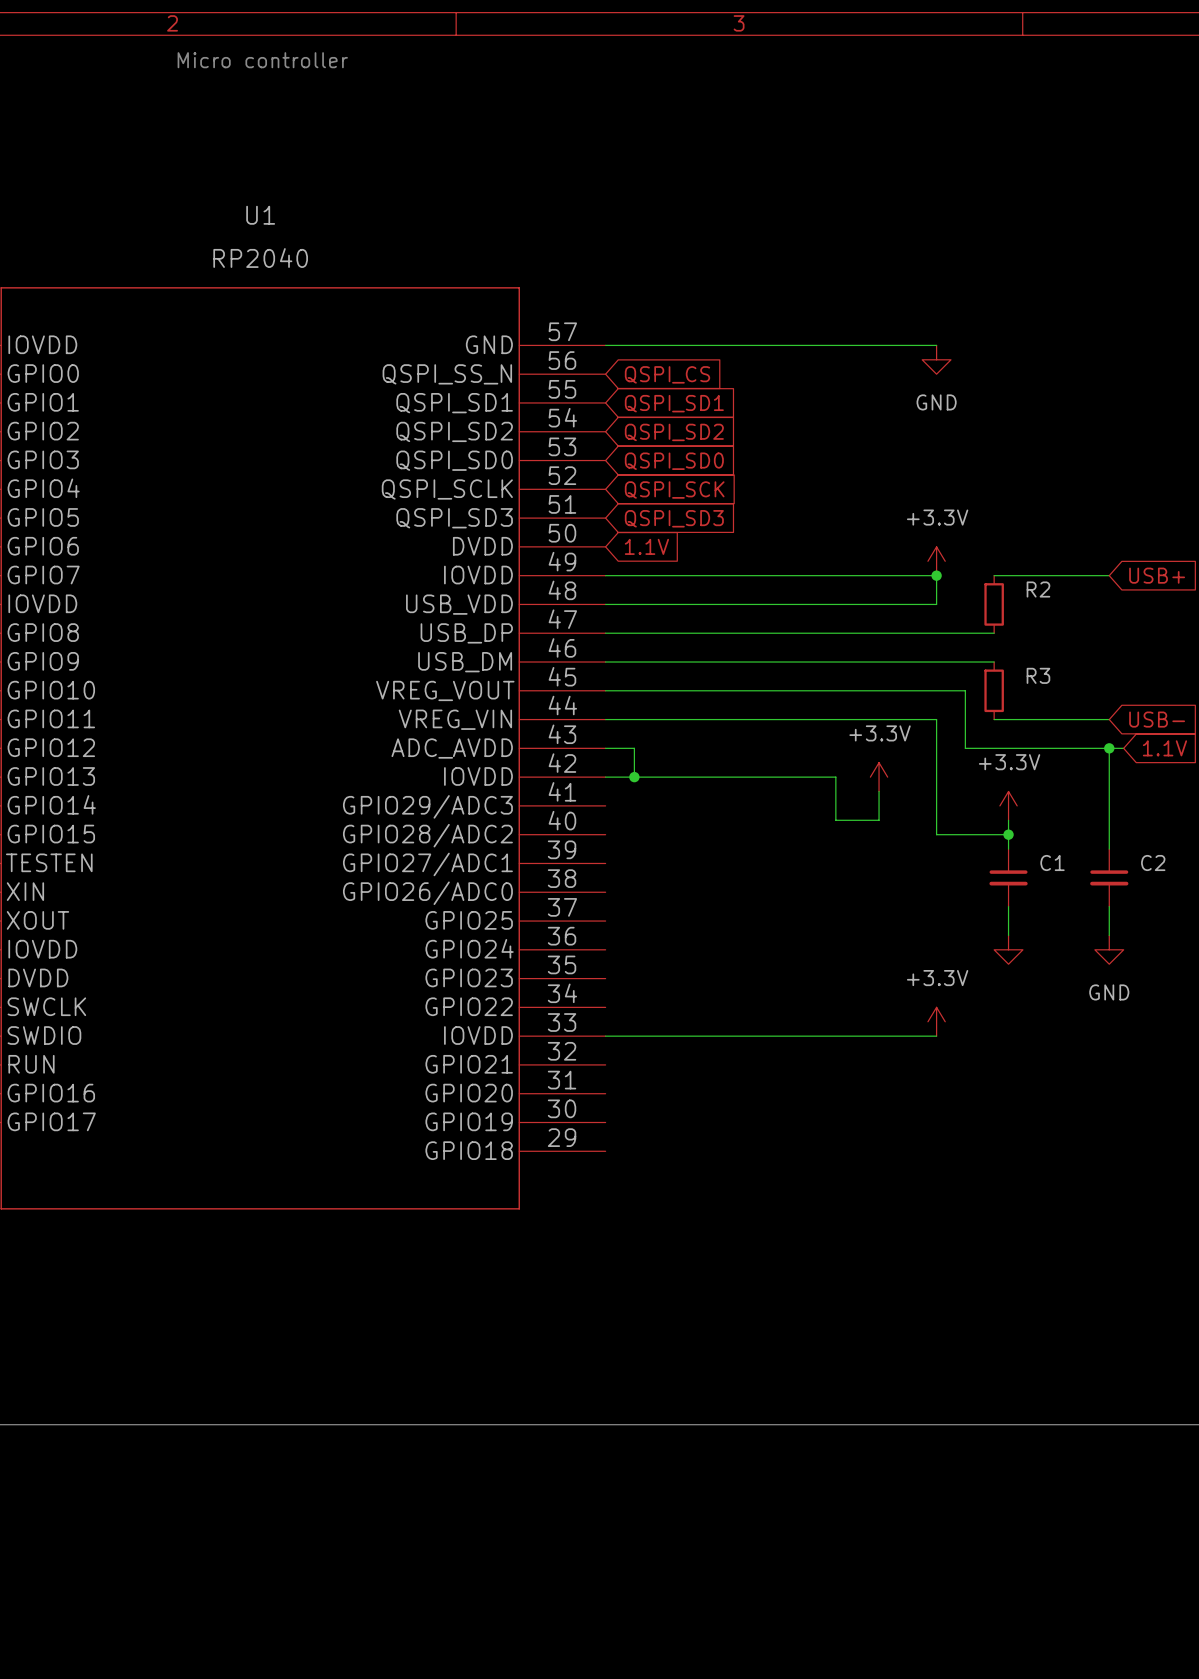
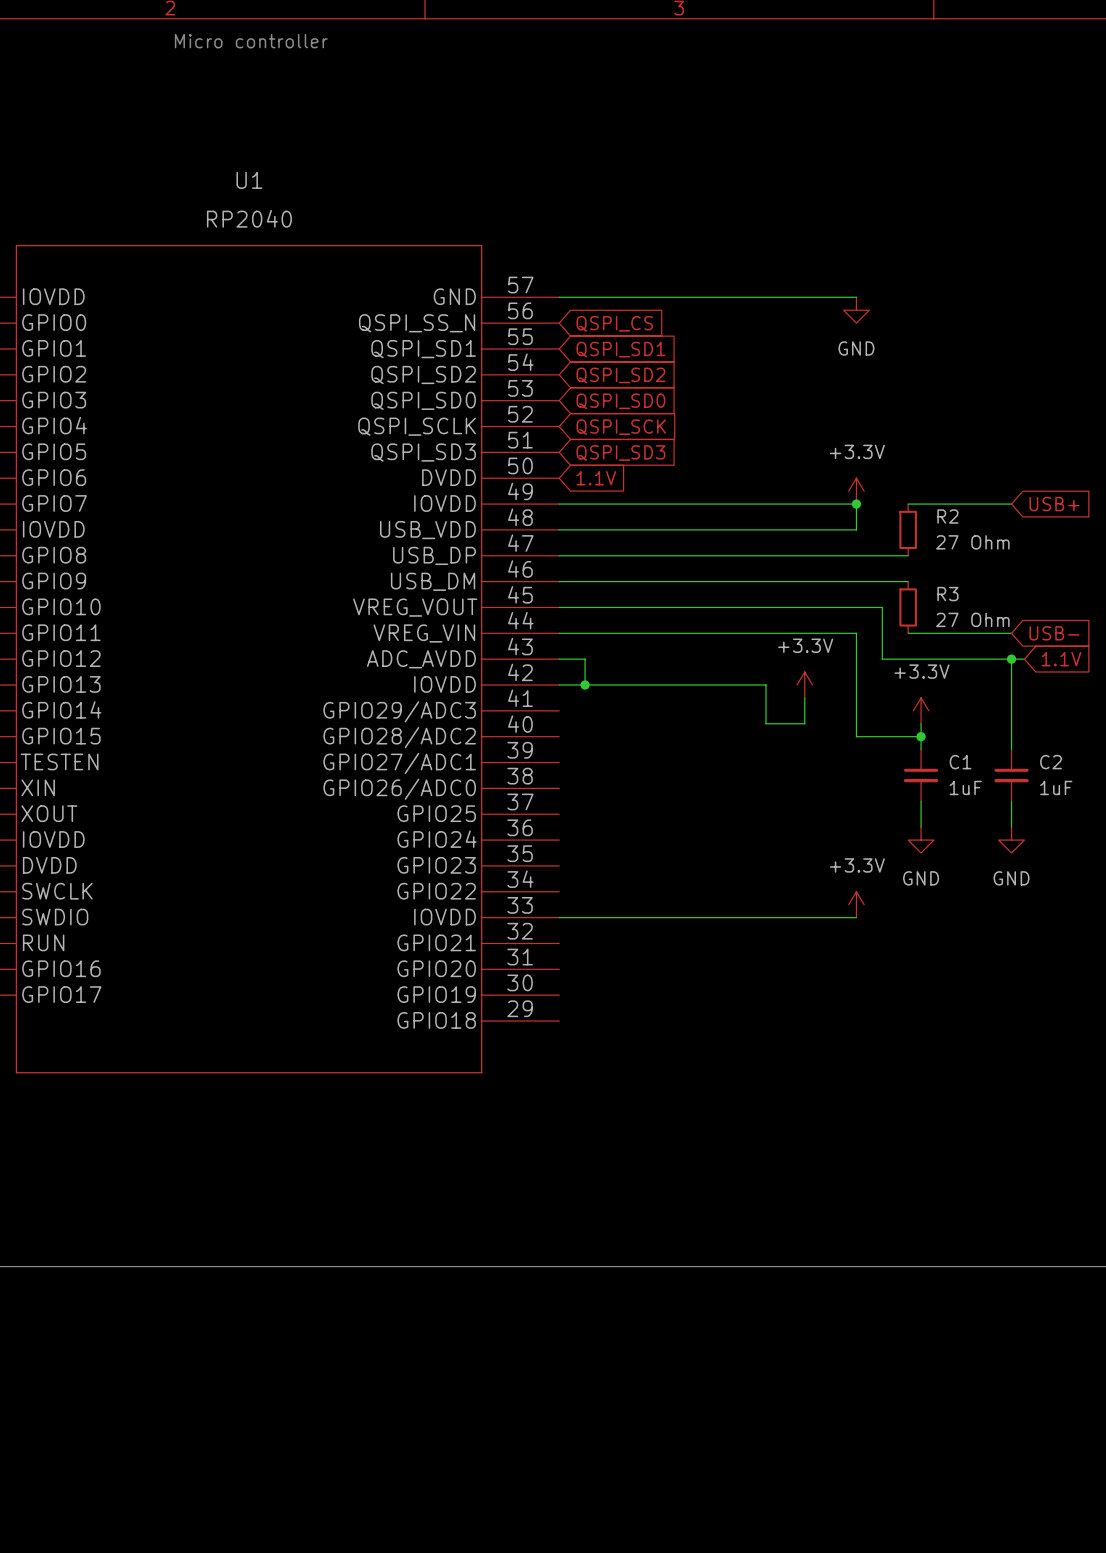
R2 value: none -> 27 Ohm (972, 542)
R3 value: none -> 27 Ohm (972, 619)
C1 value: none -> 1uF (965, 787)
C2 value: none -> 1uF (1056, 787)
power symbol text: none -> GND (921, 878)

